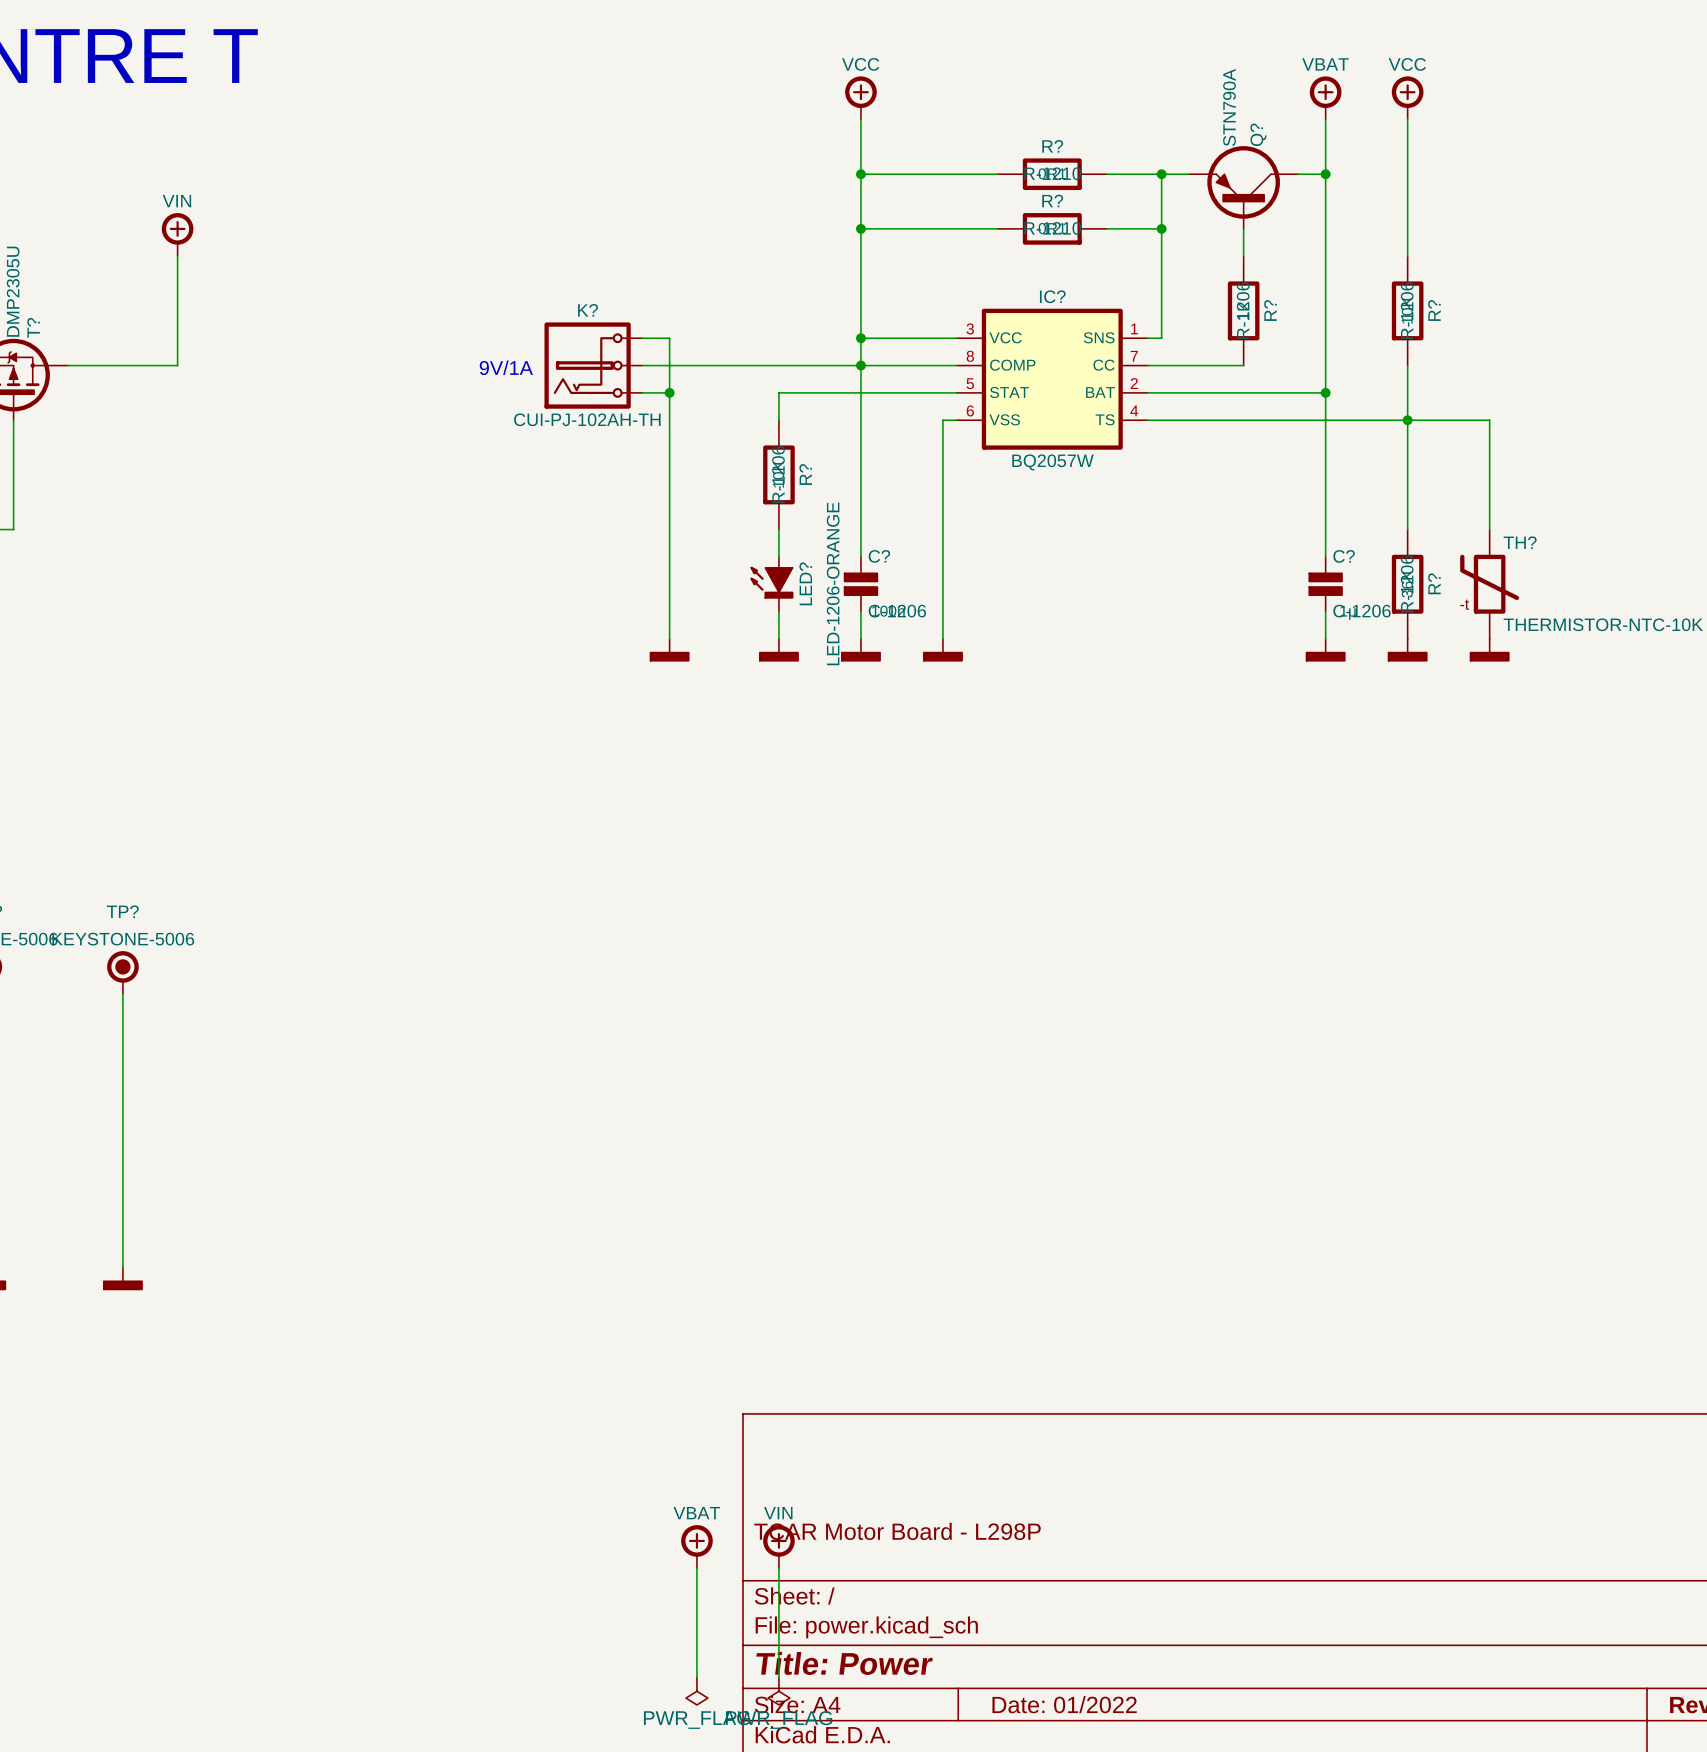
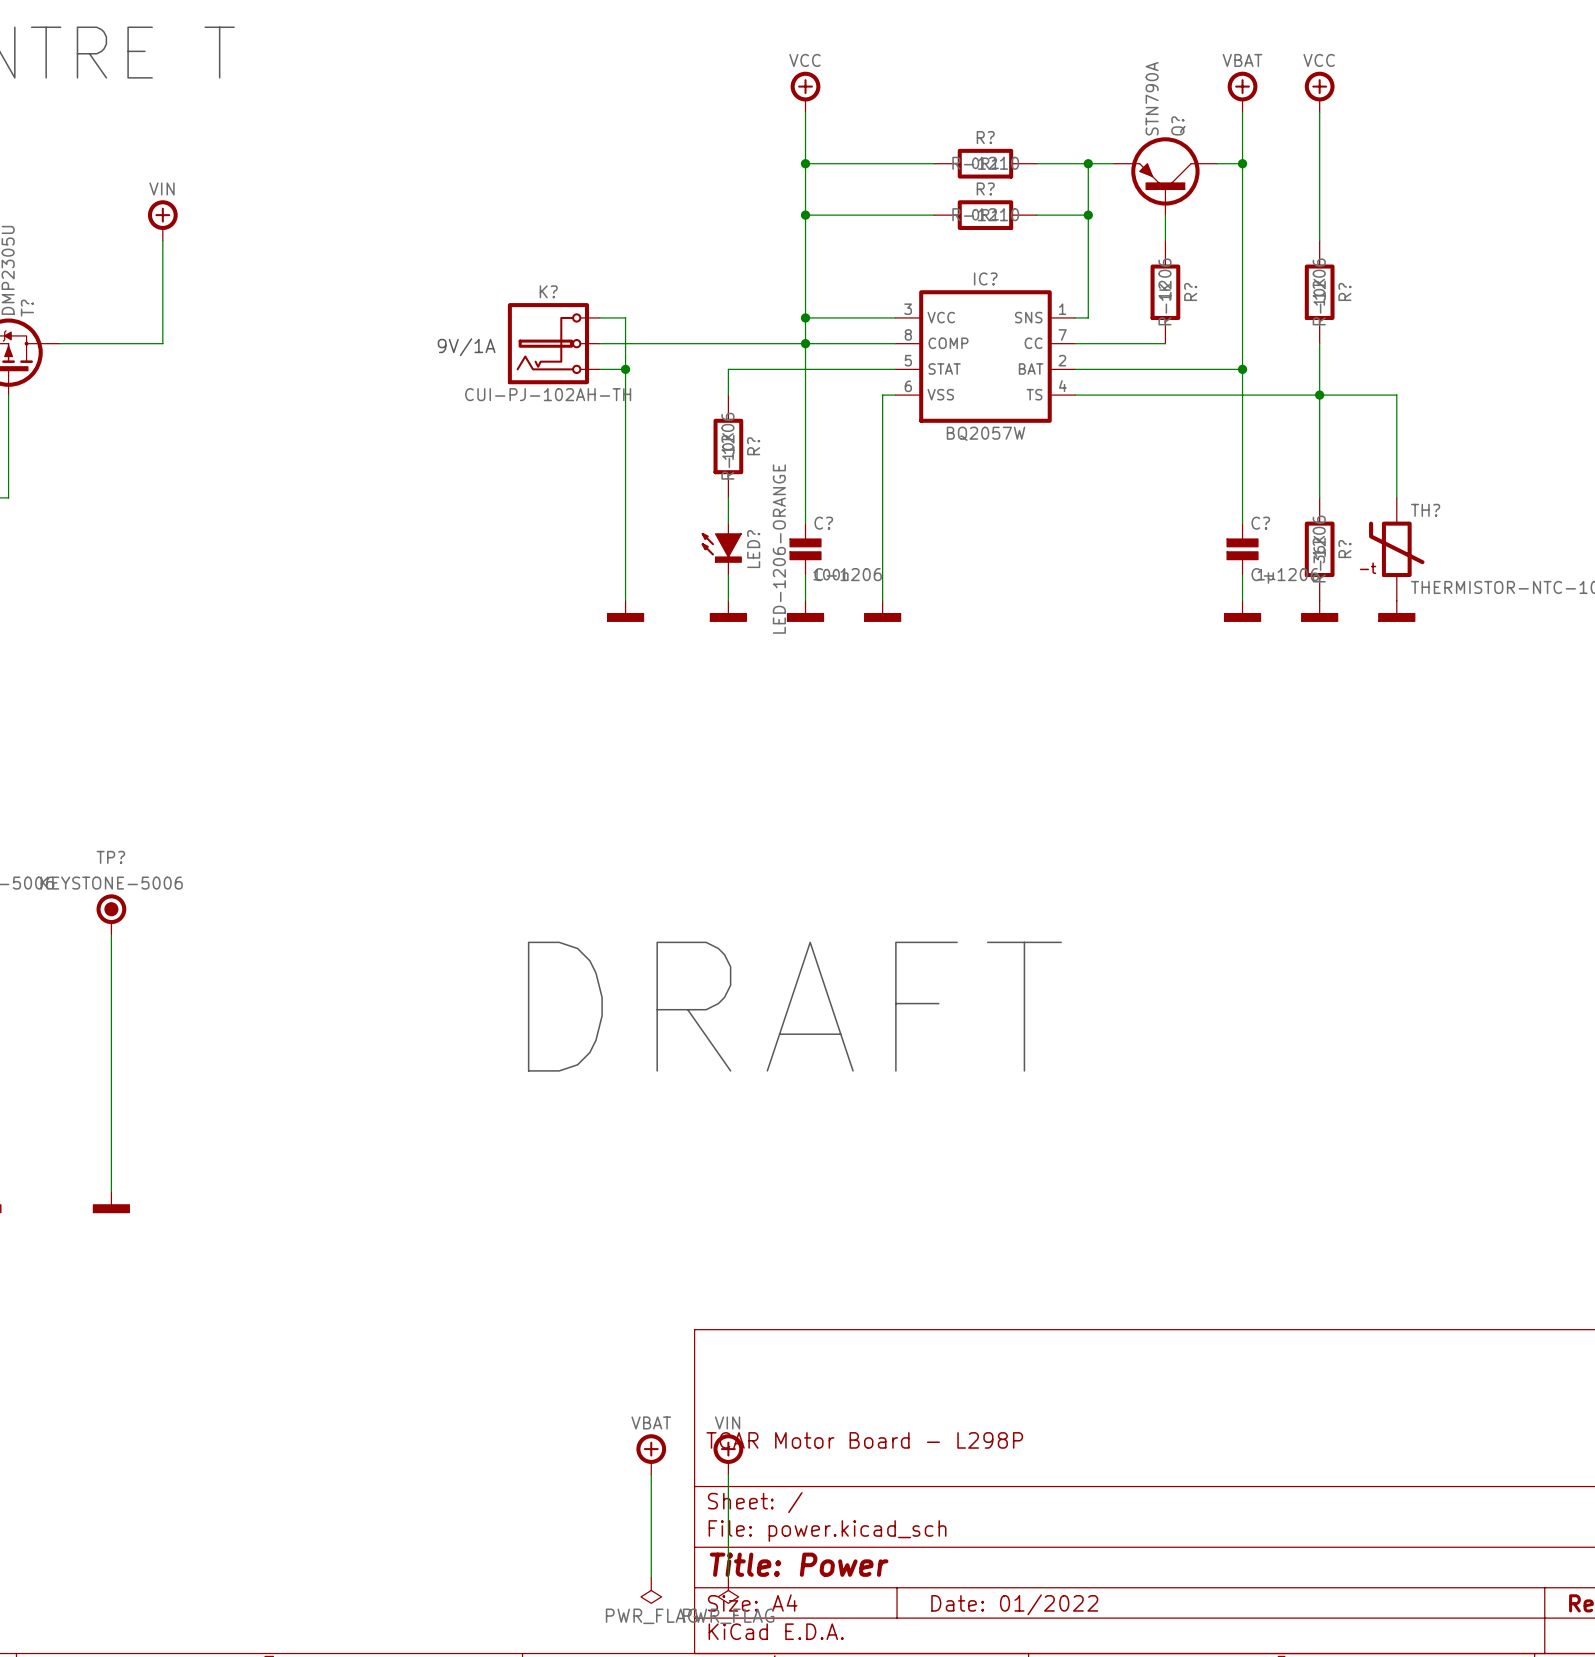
text: none -> DRAFT (794, 1006)

